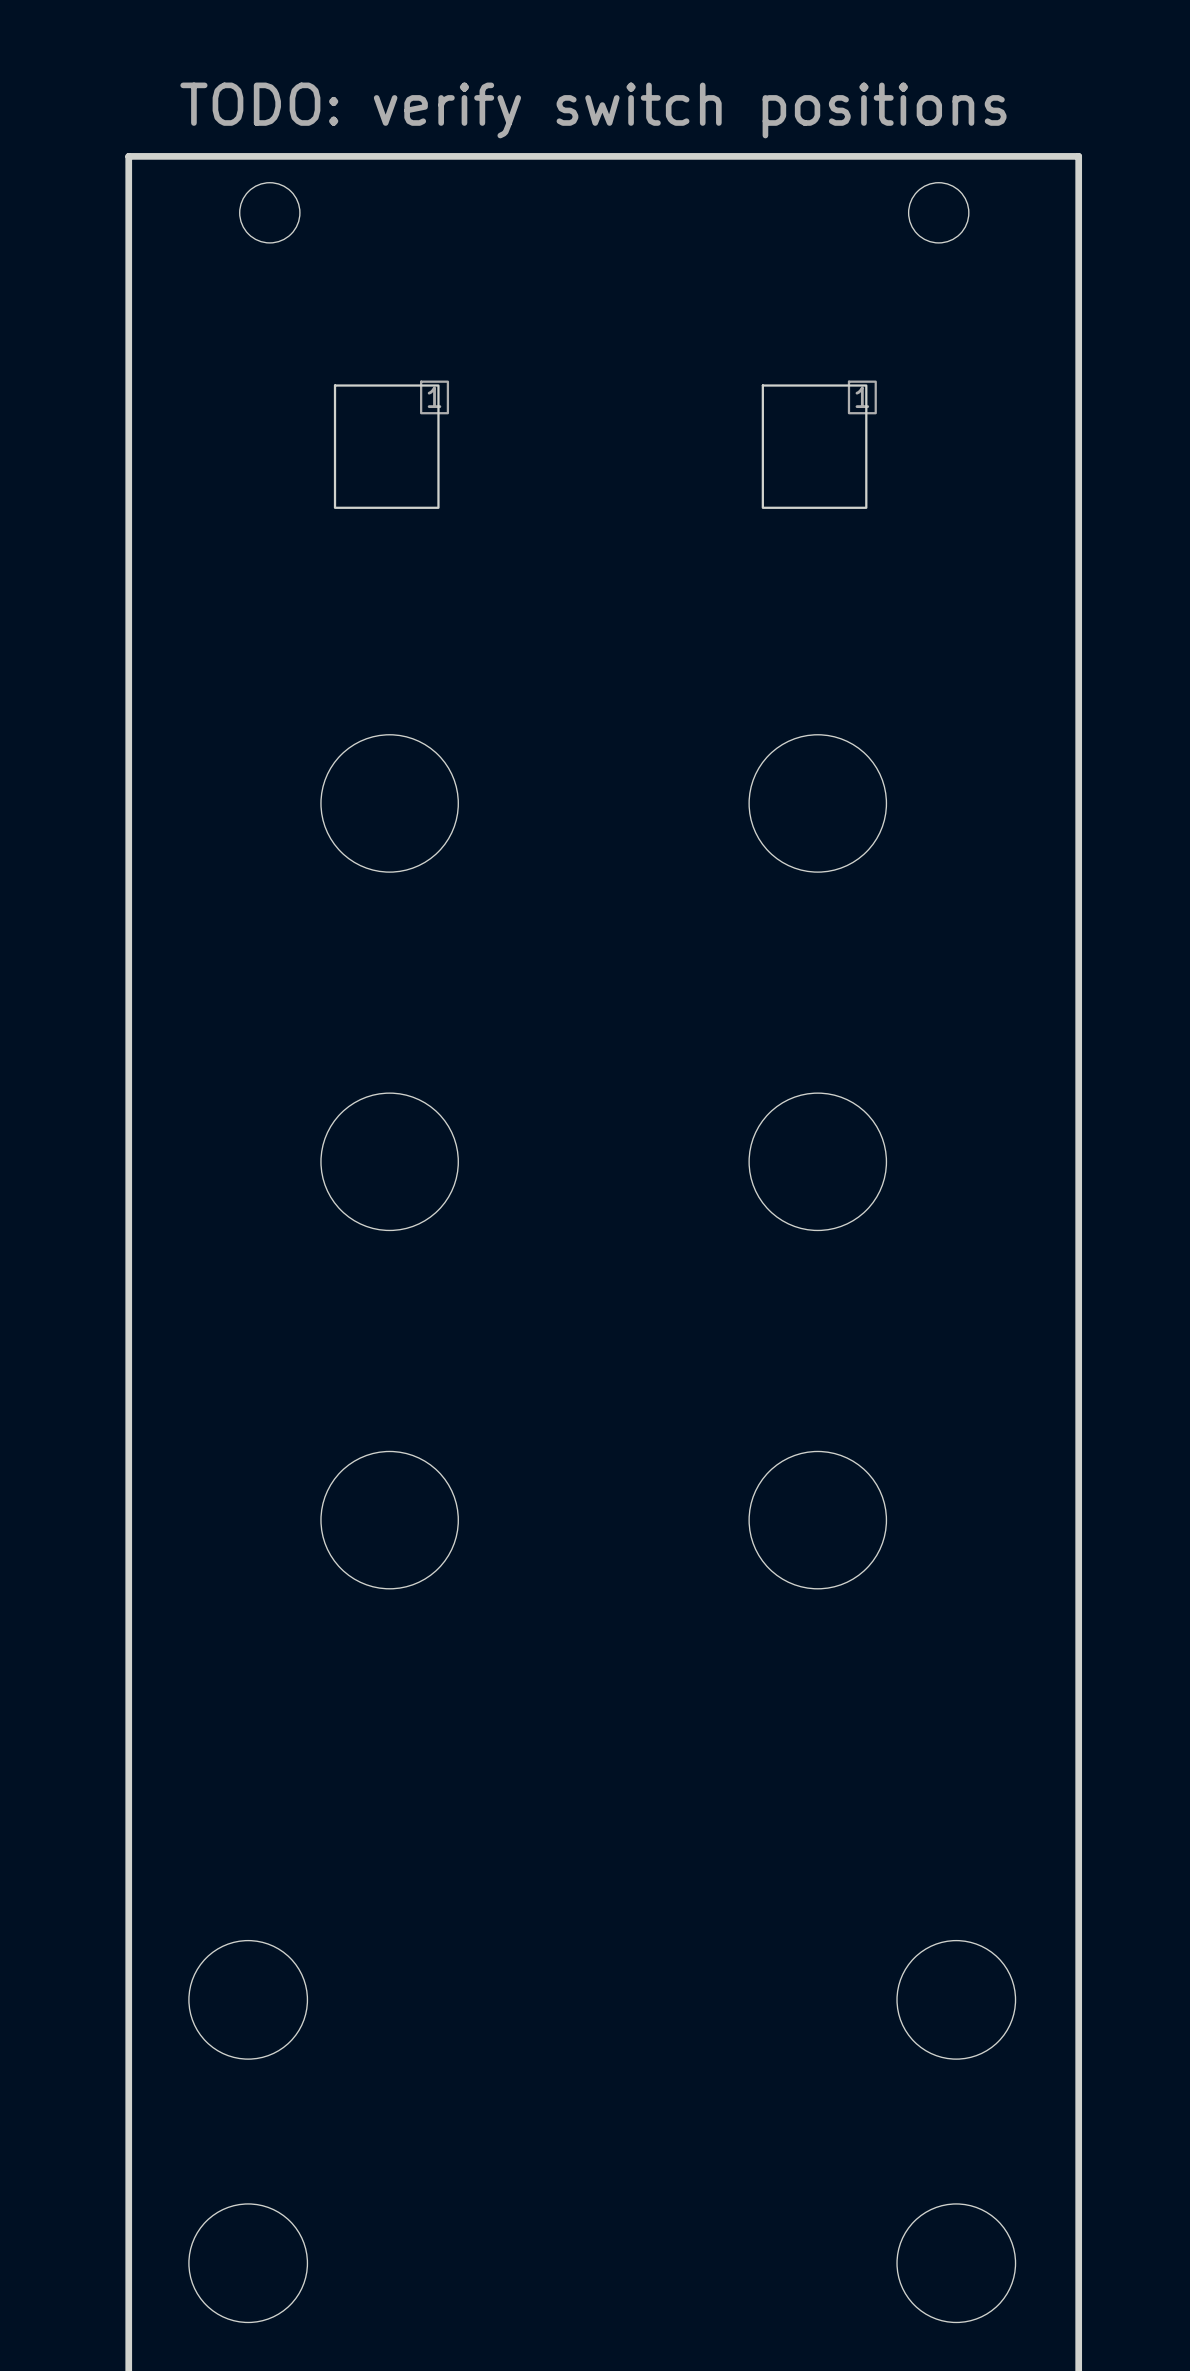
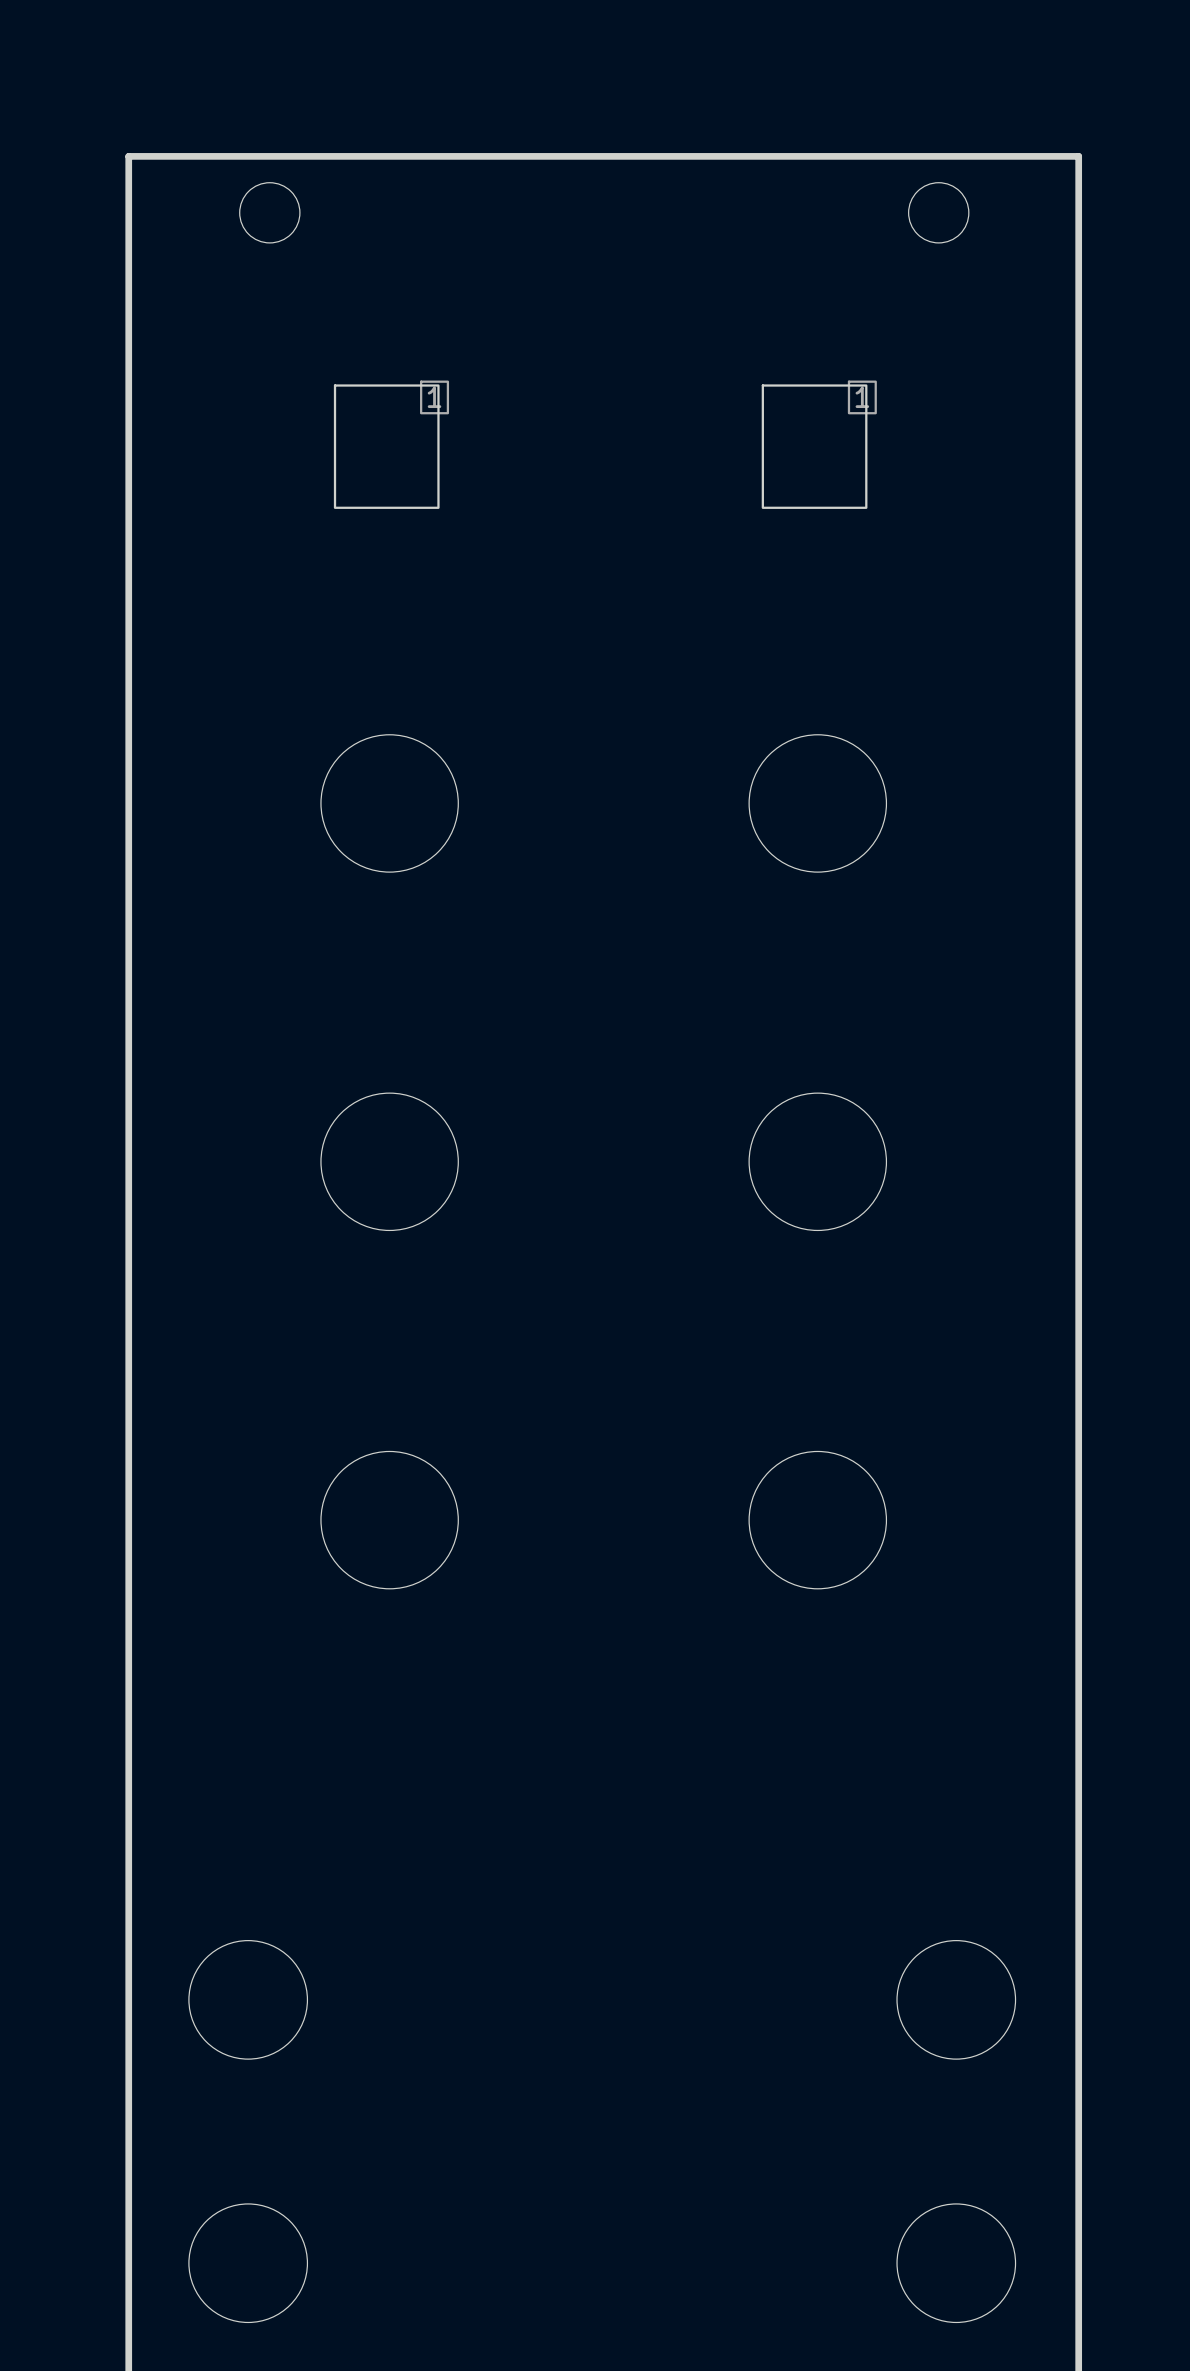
text: TODO: verify switch positions (593, 110) -> none

